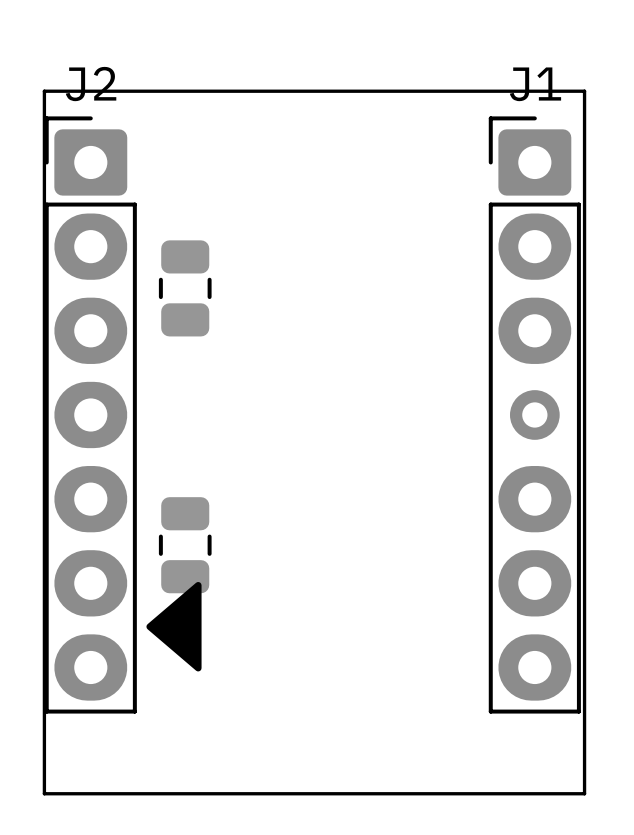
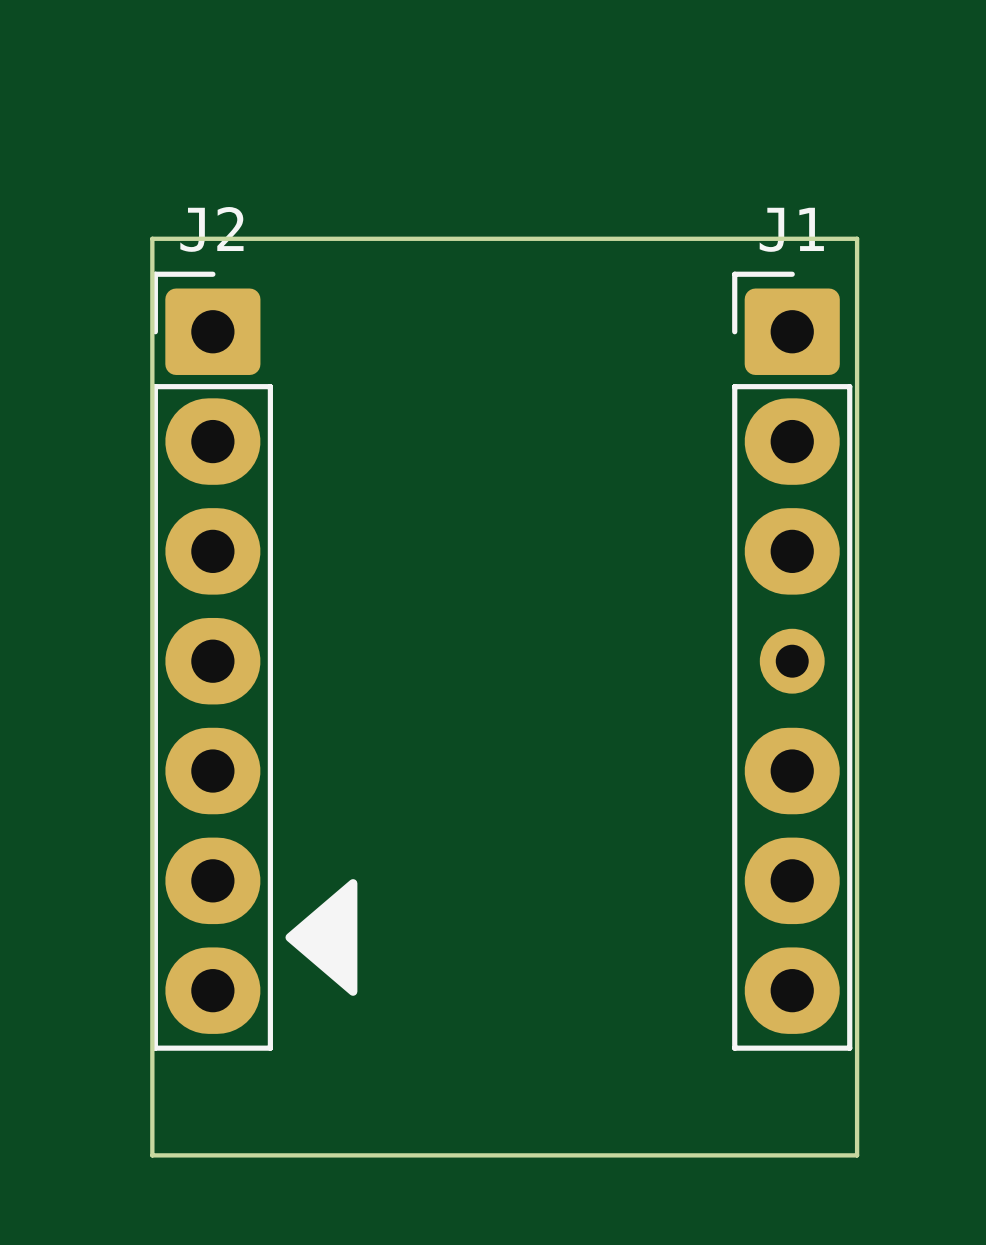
part: (185, 288) -> none
part: (185, 545) -> none

